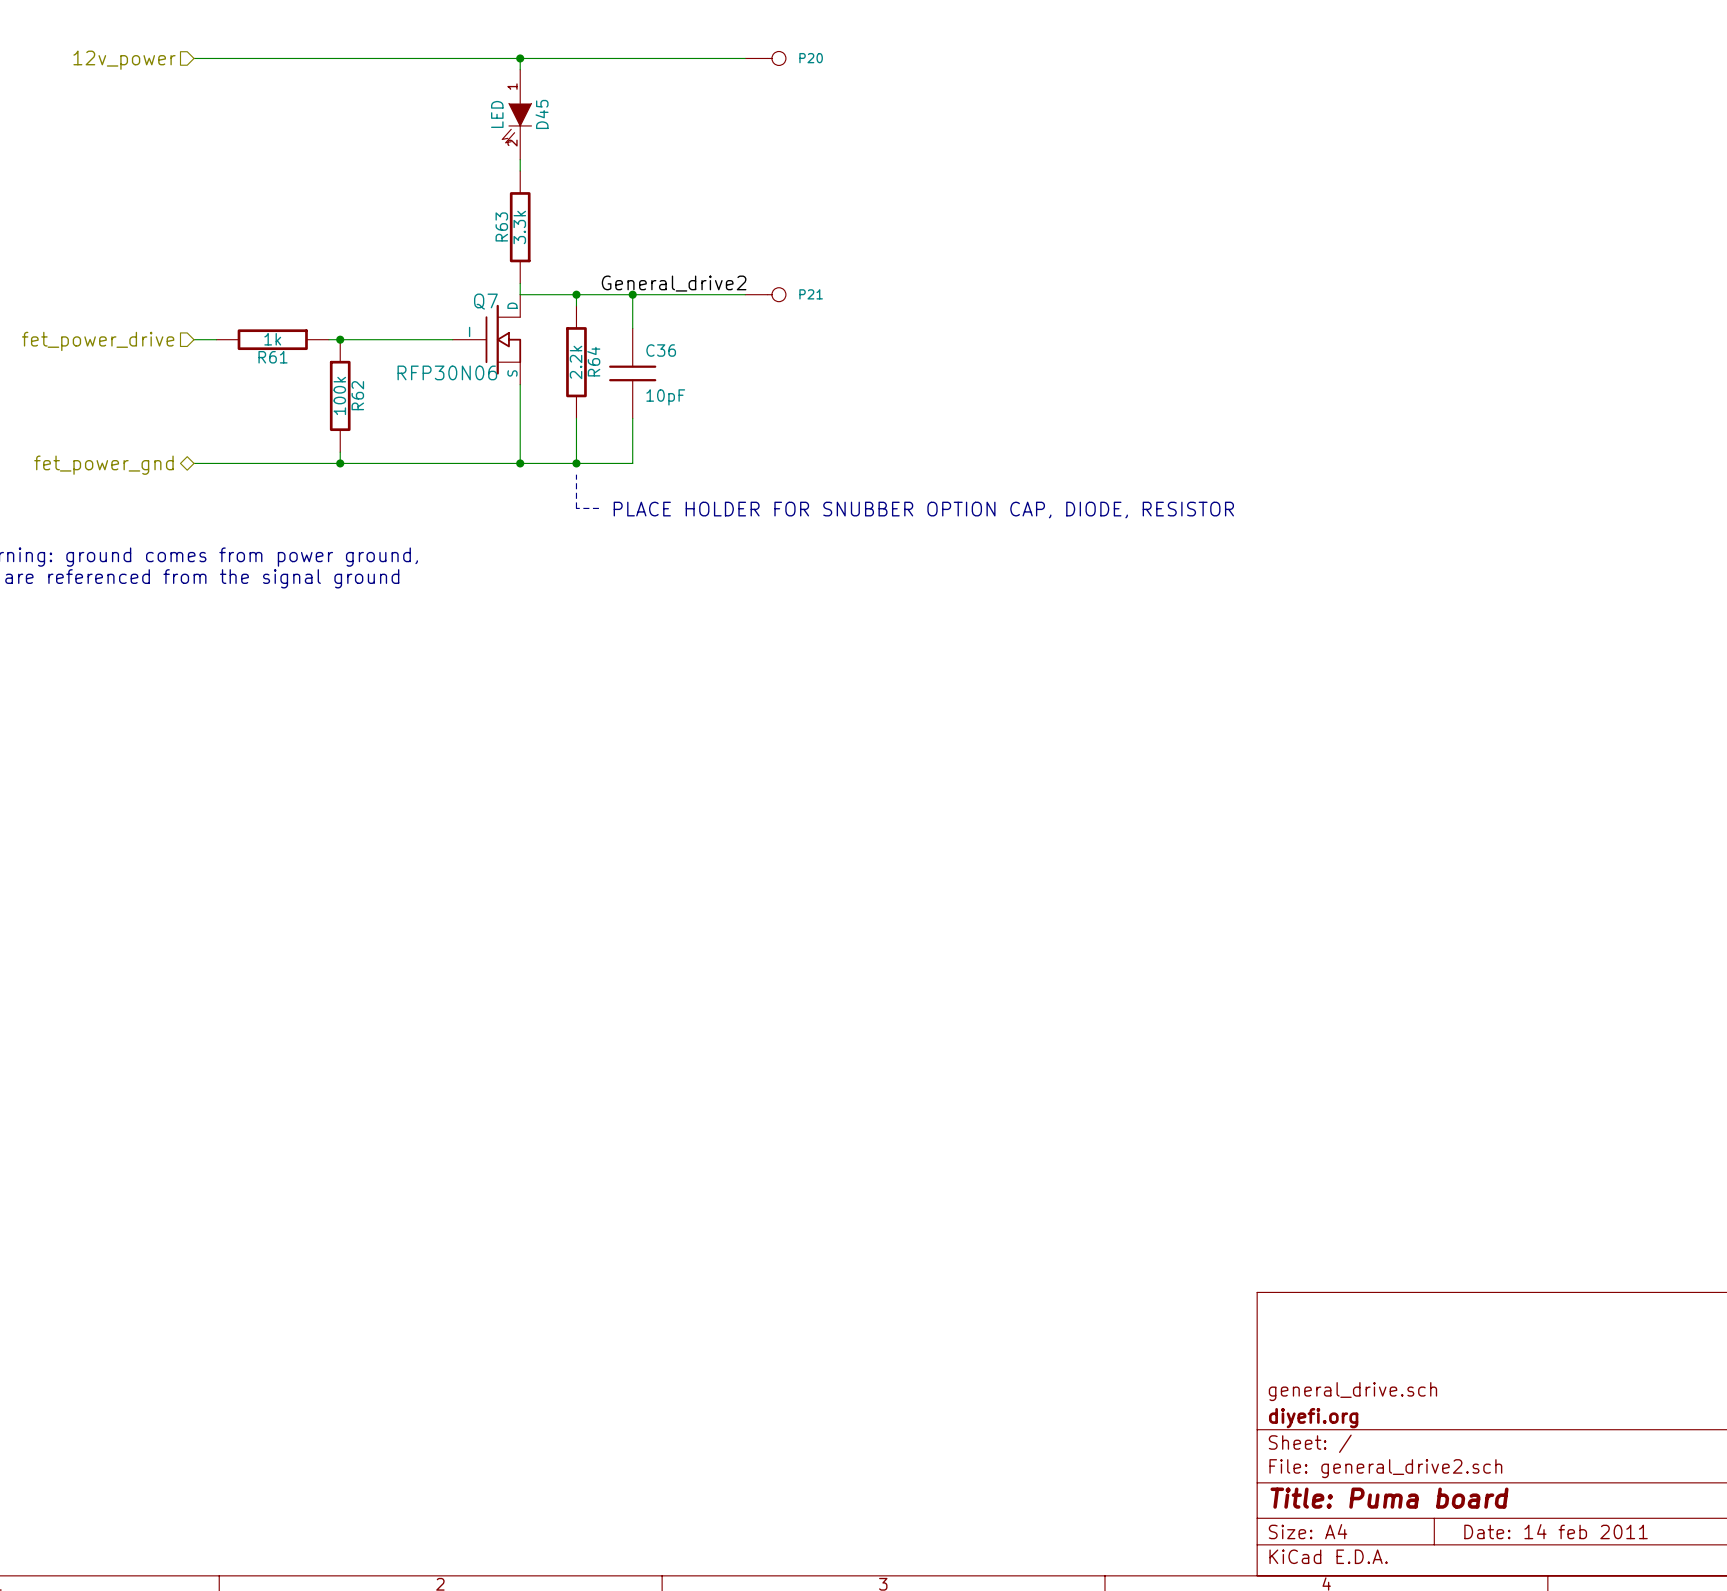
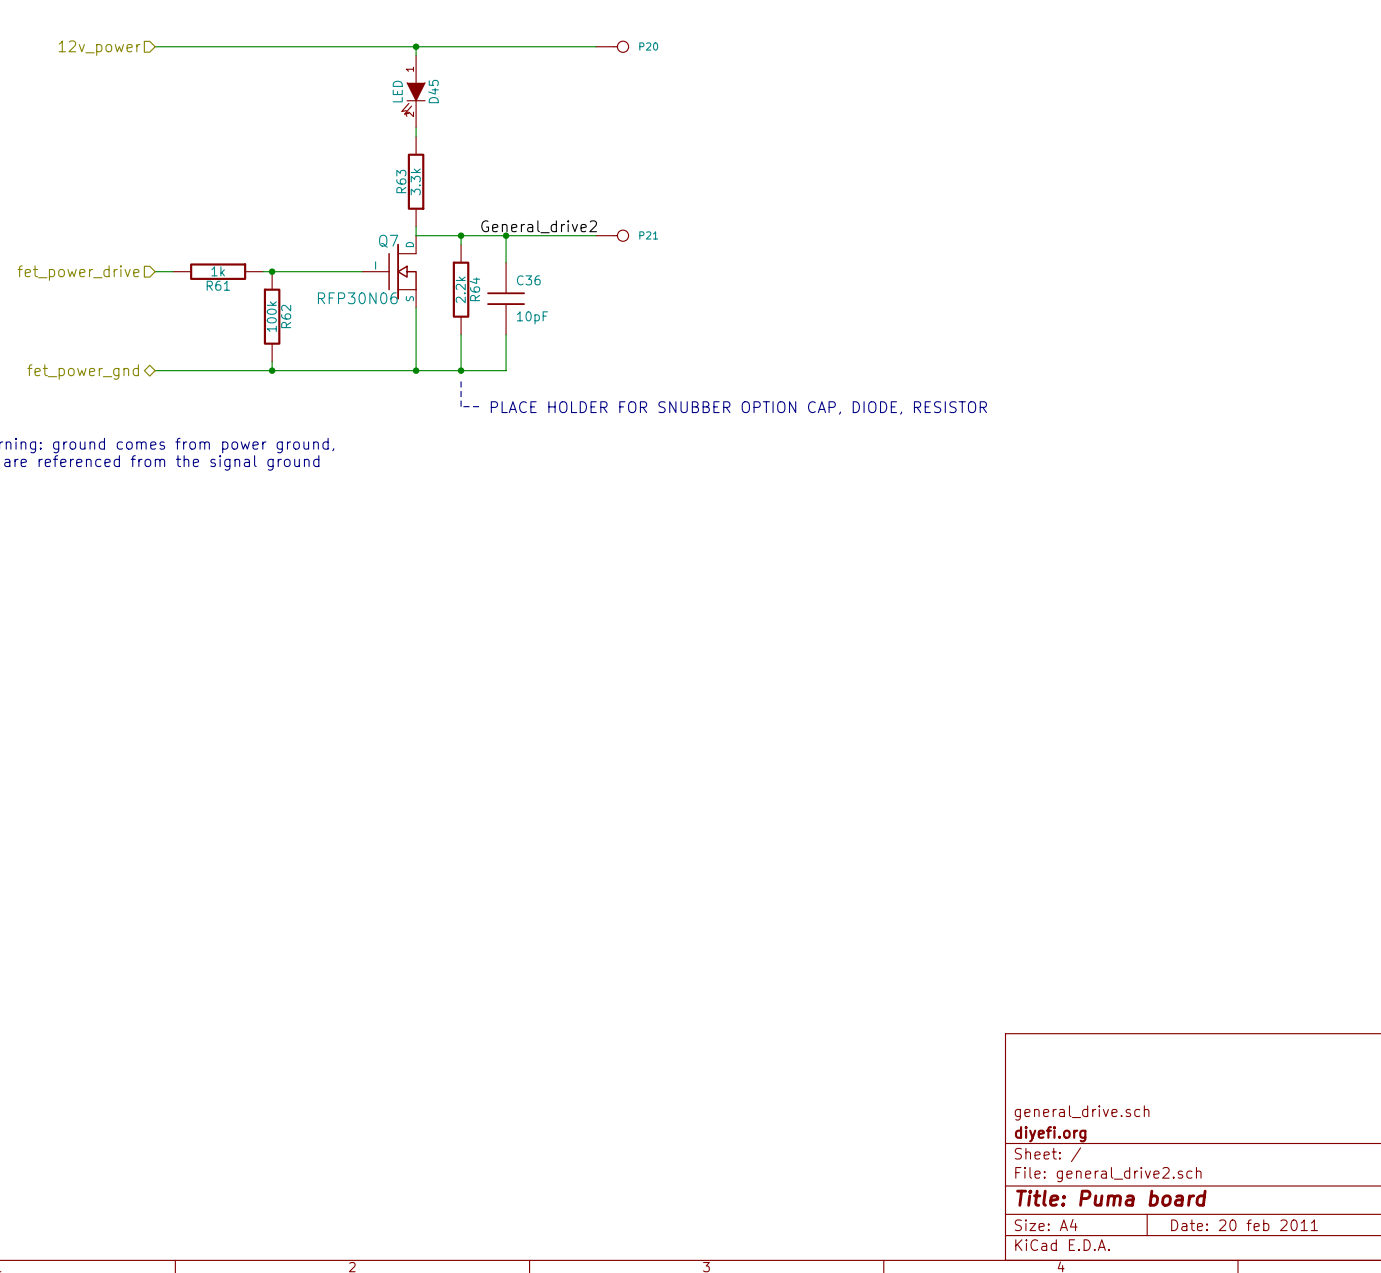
title block: Date: 14 feb 2011 (1556, 1531) -> Date: 20 feb 2011 (1244, 1225)

